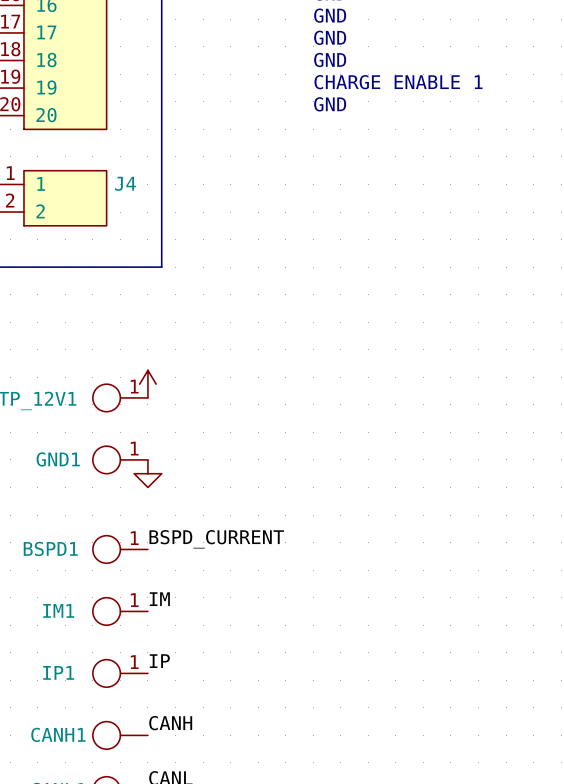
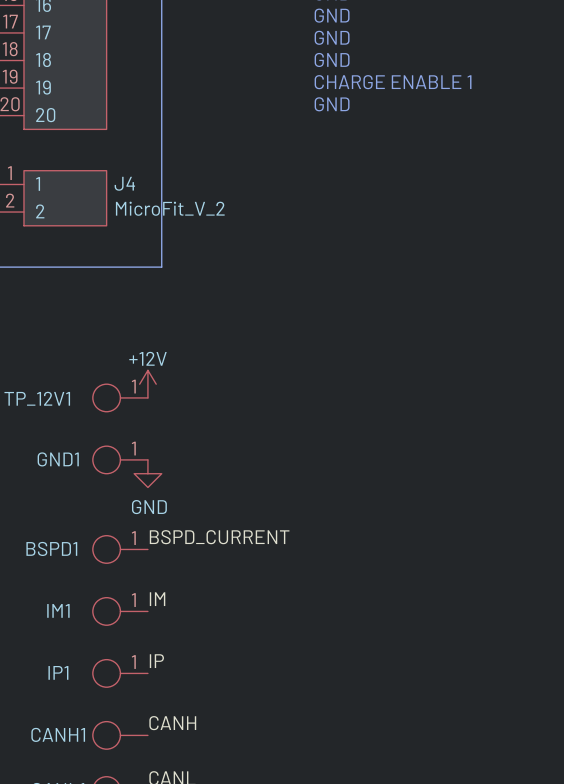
J4 value: none -> MicroFit_V_2 (170, 208)
power symbol text: none -> +12V (148, 358)
power symbol text: none -> GND (149, 507)

